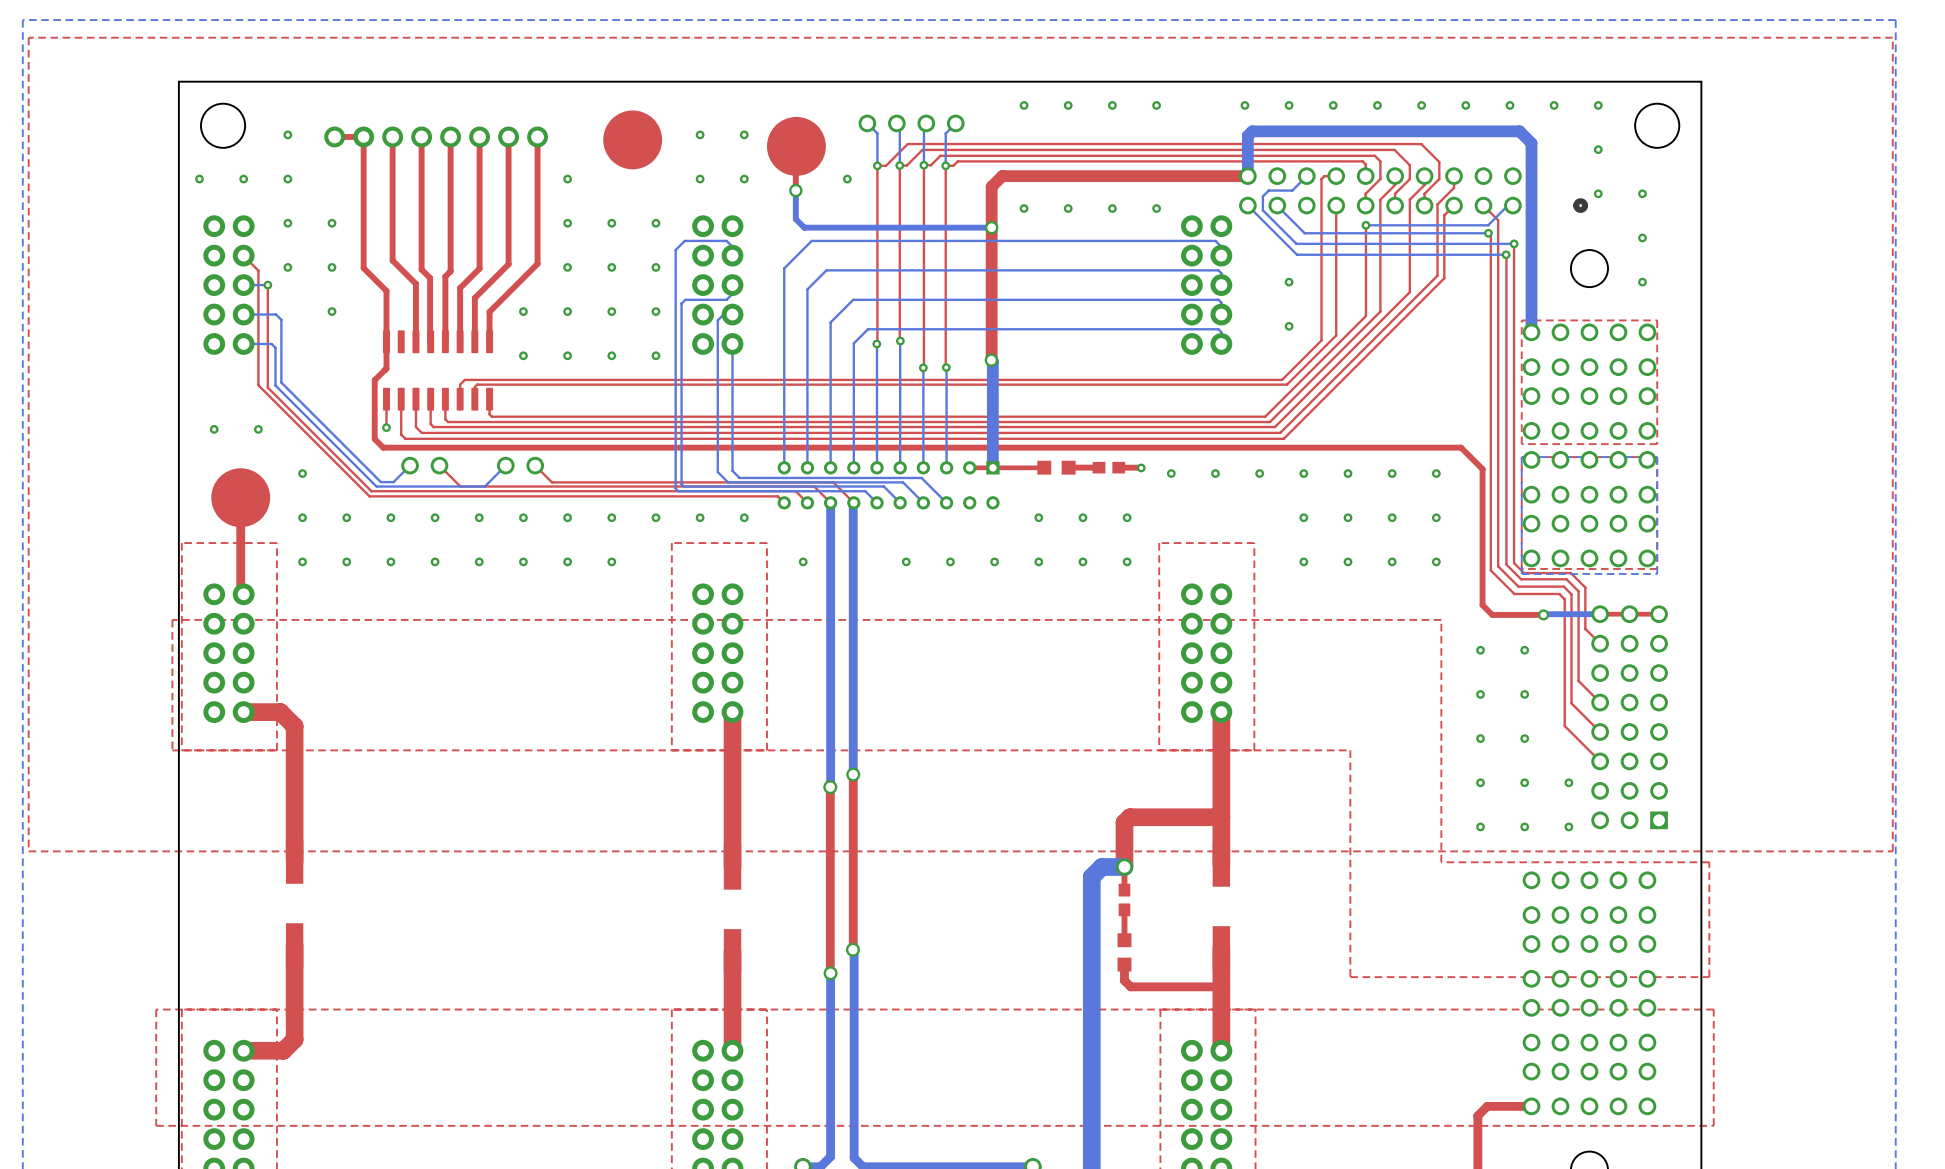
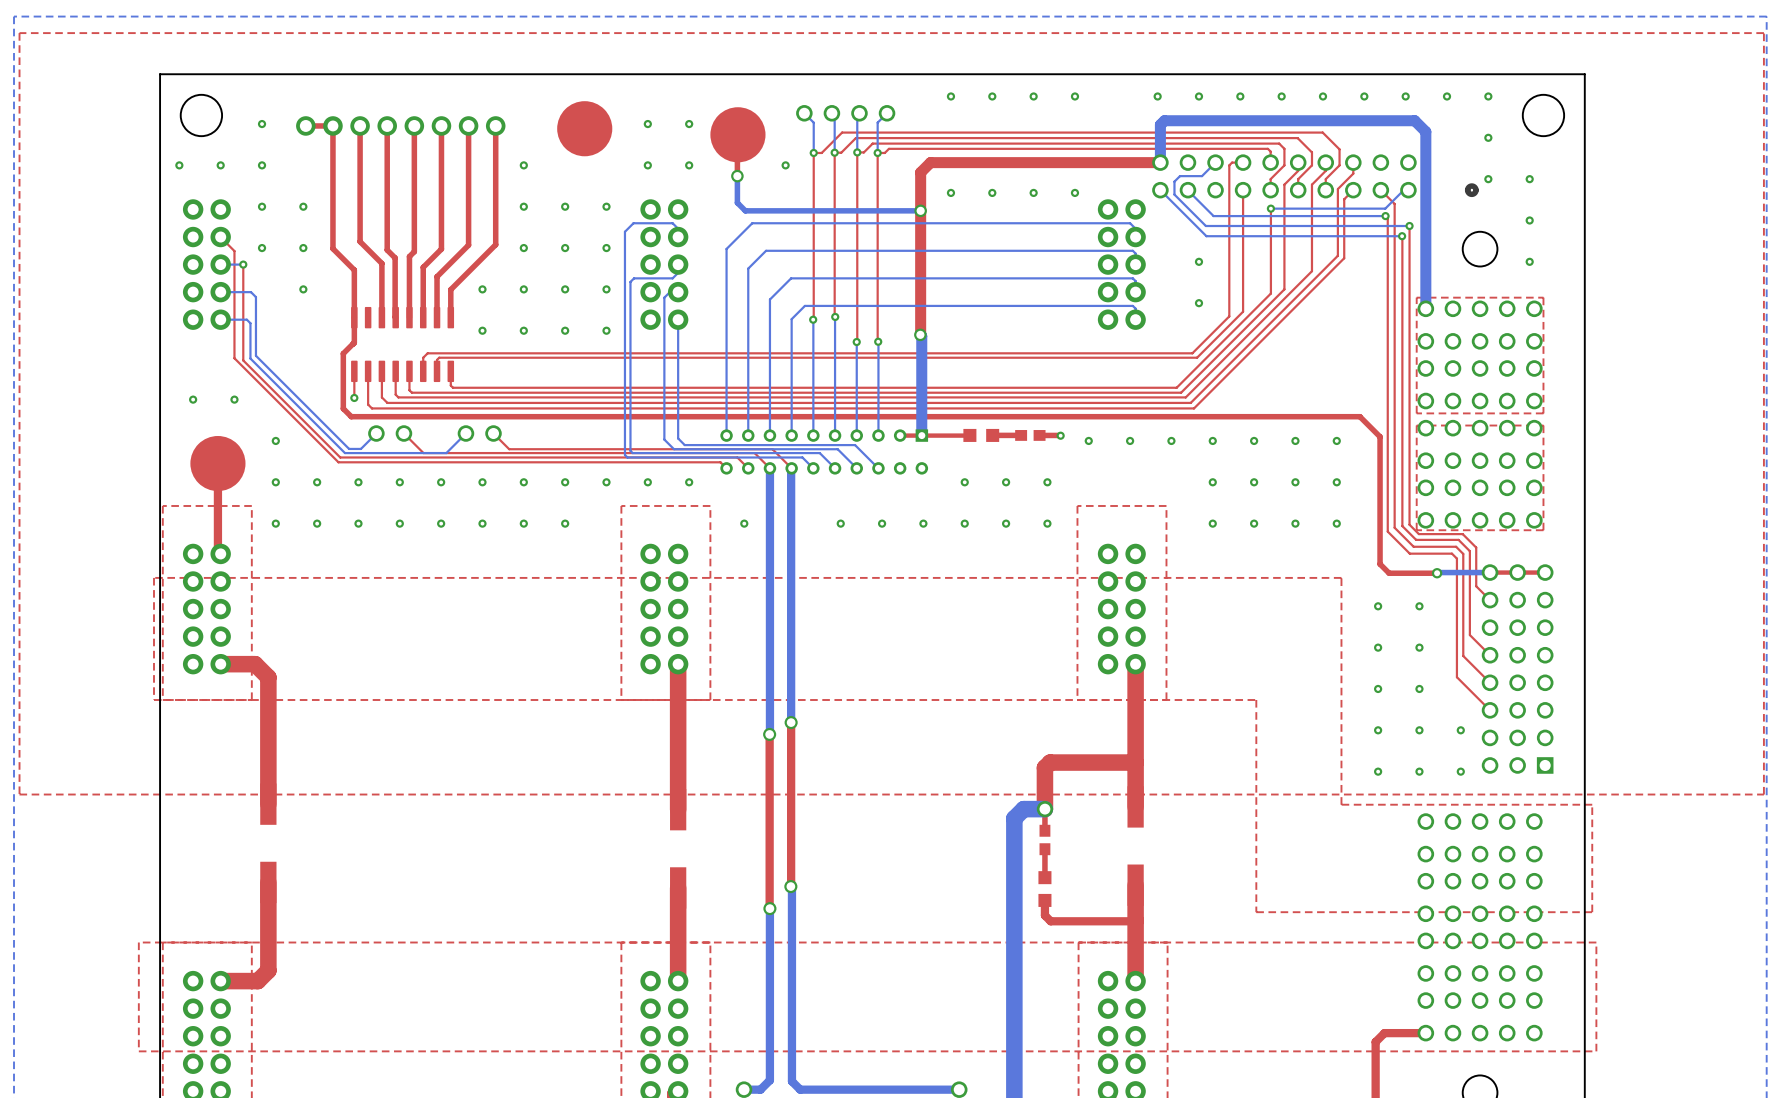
bottom zone outline: (1657, 457) (1657, 573) (1521, 573) (1521, 457) (1657, 457) -> none

